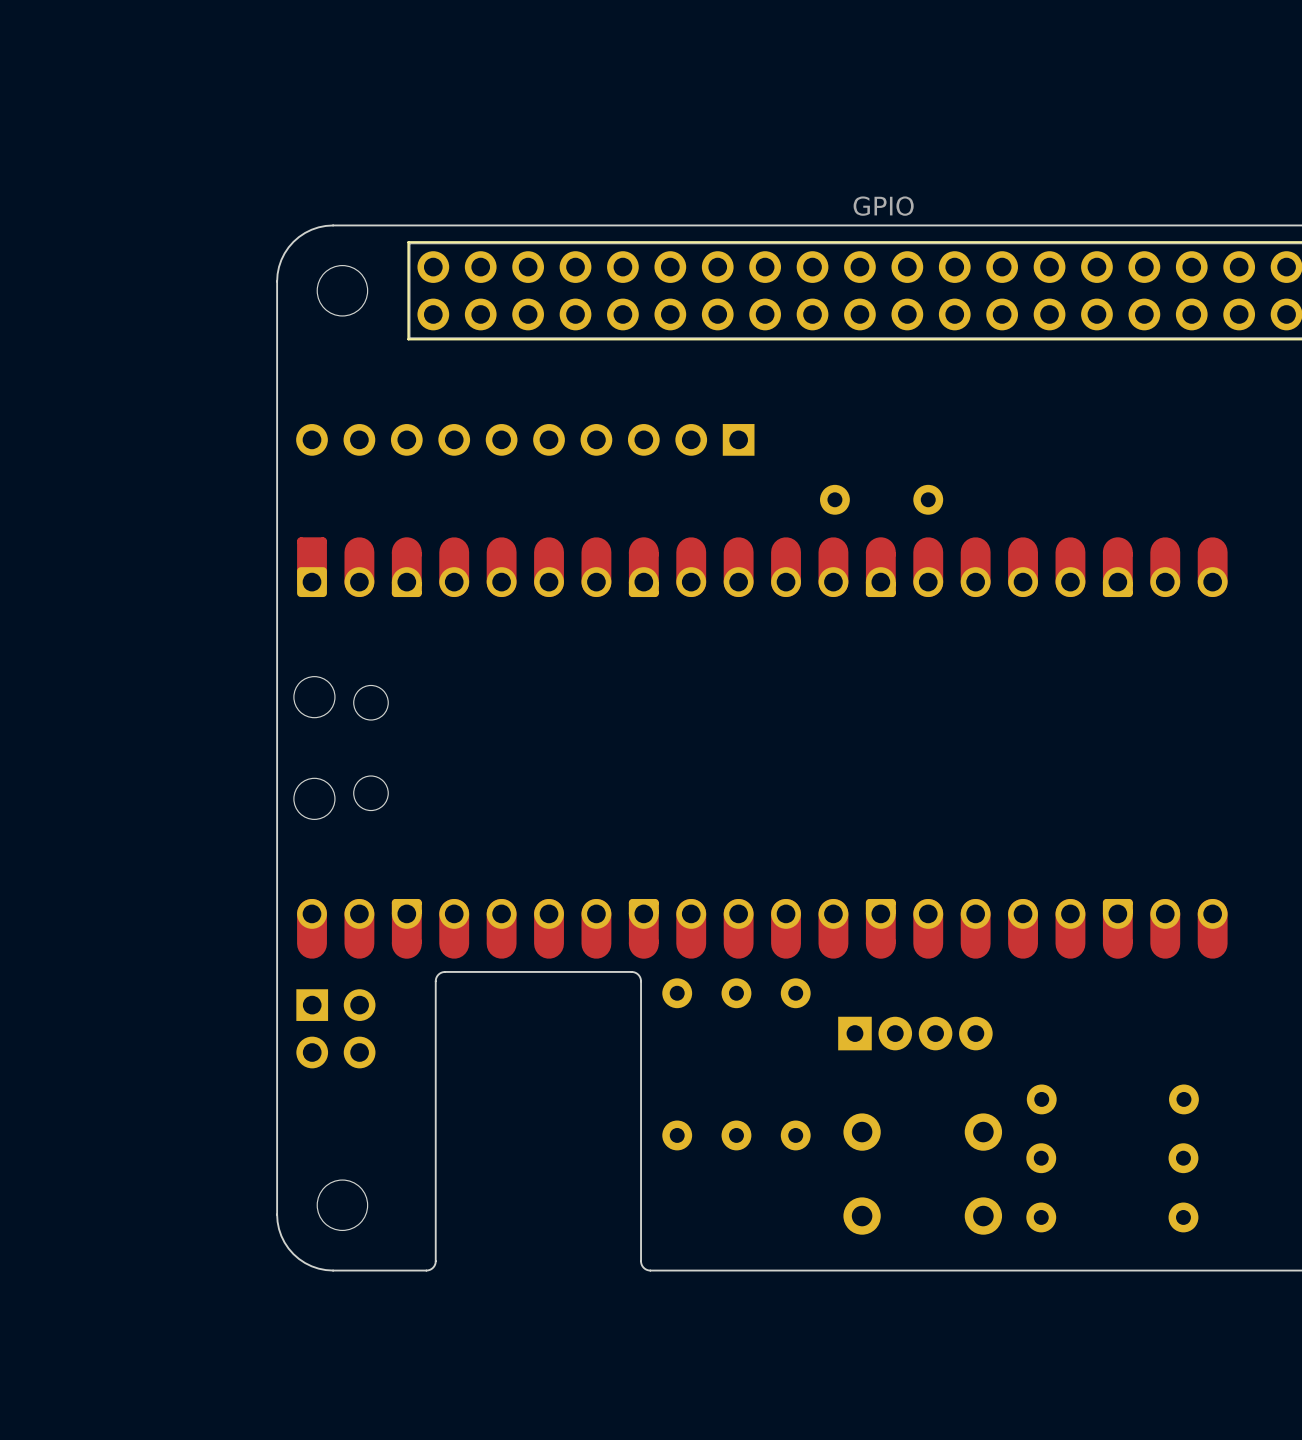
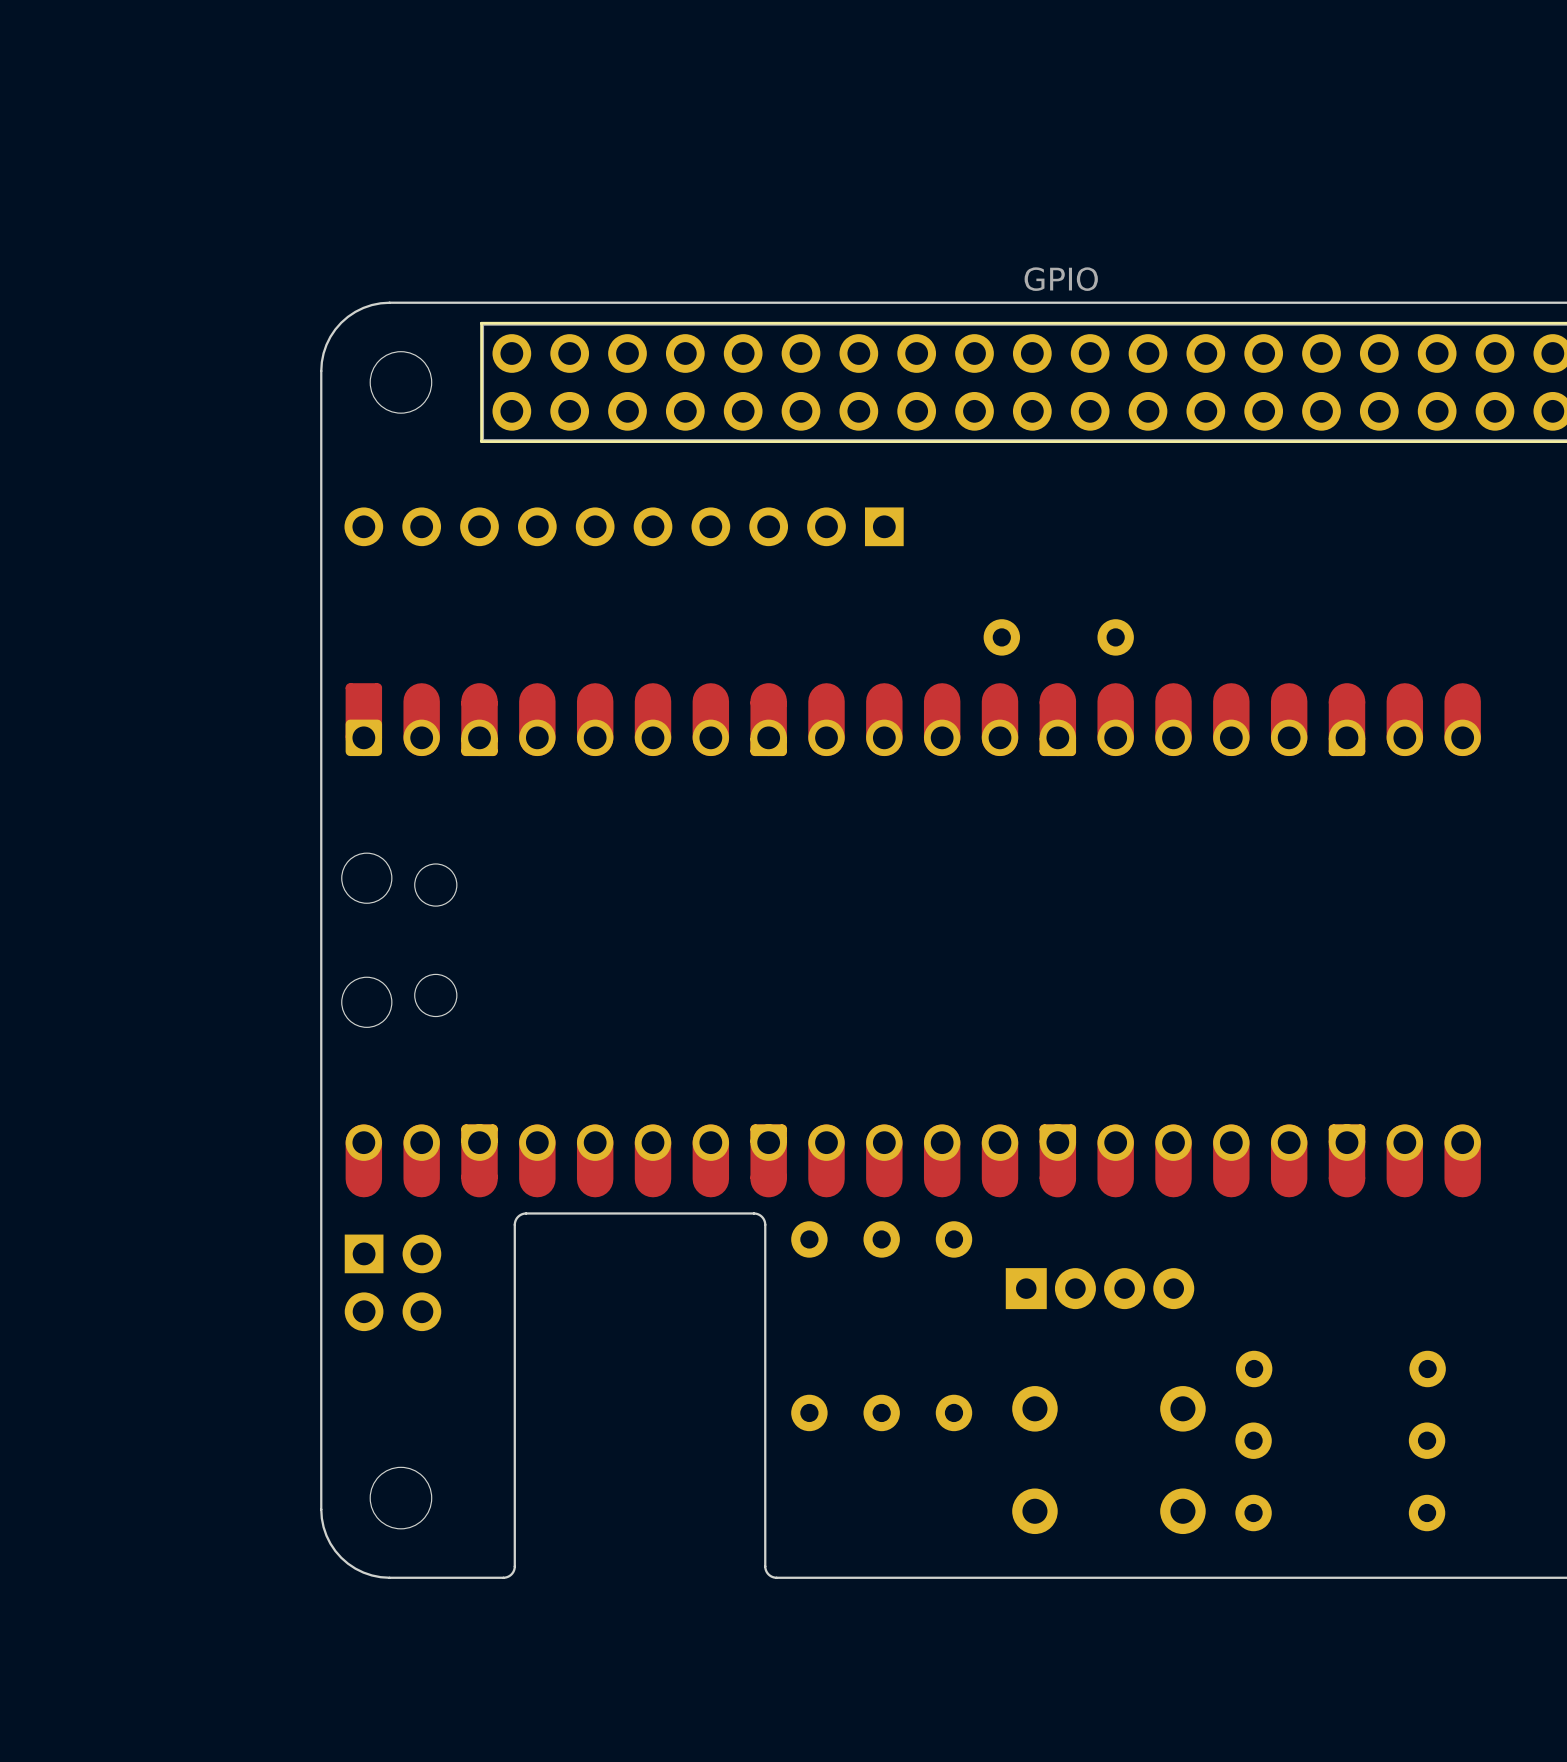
part position: (525, 439) -> (624, 526)

